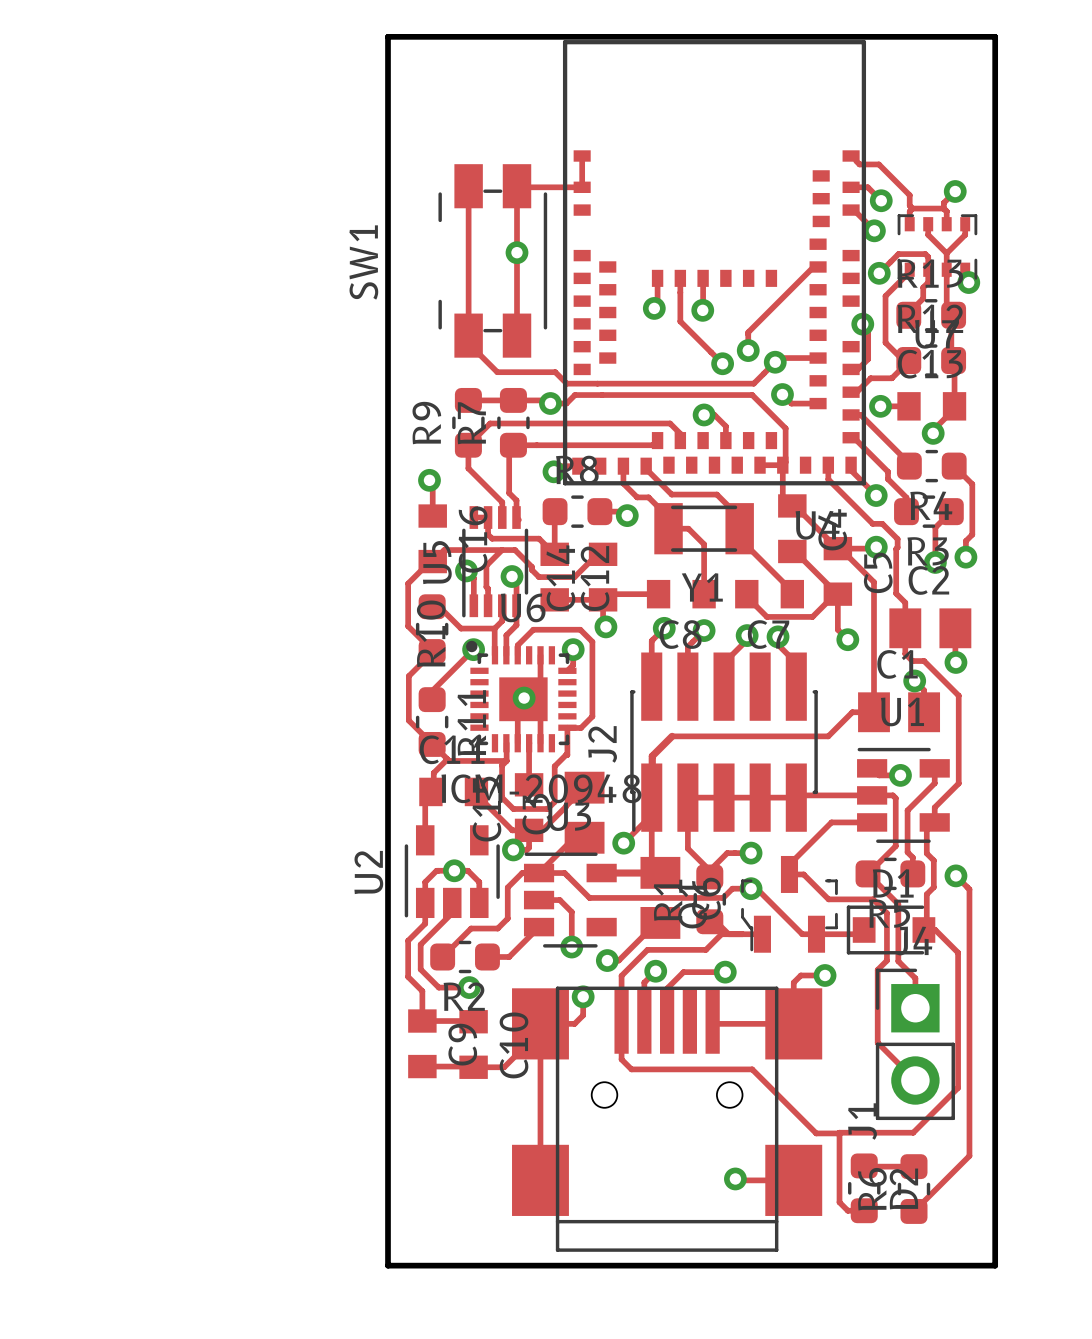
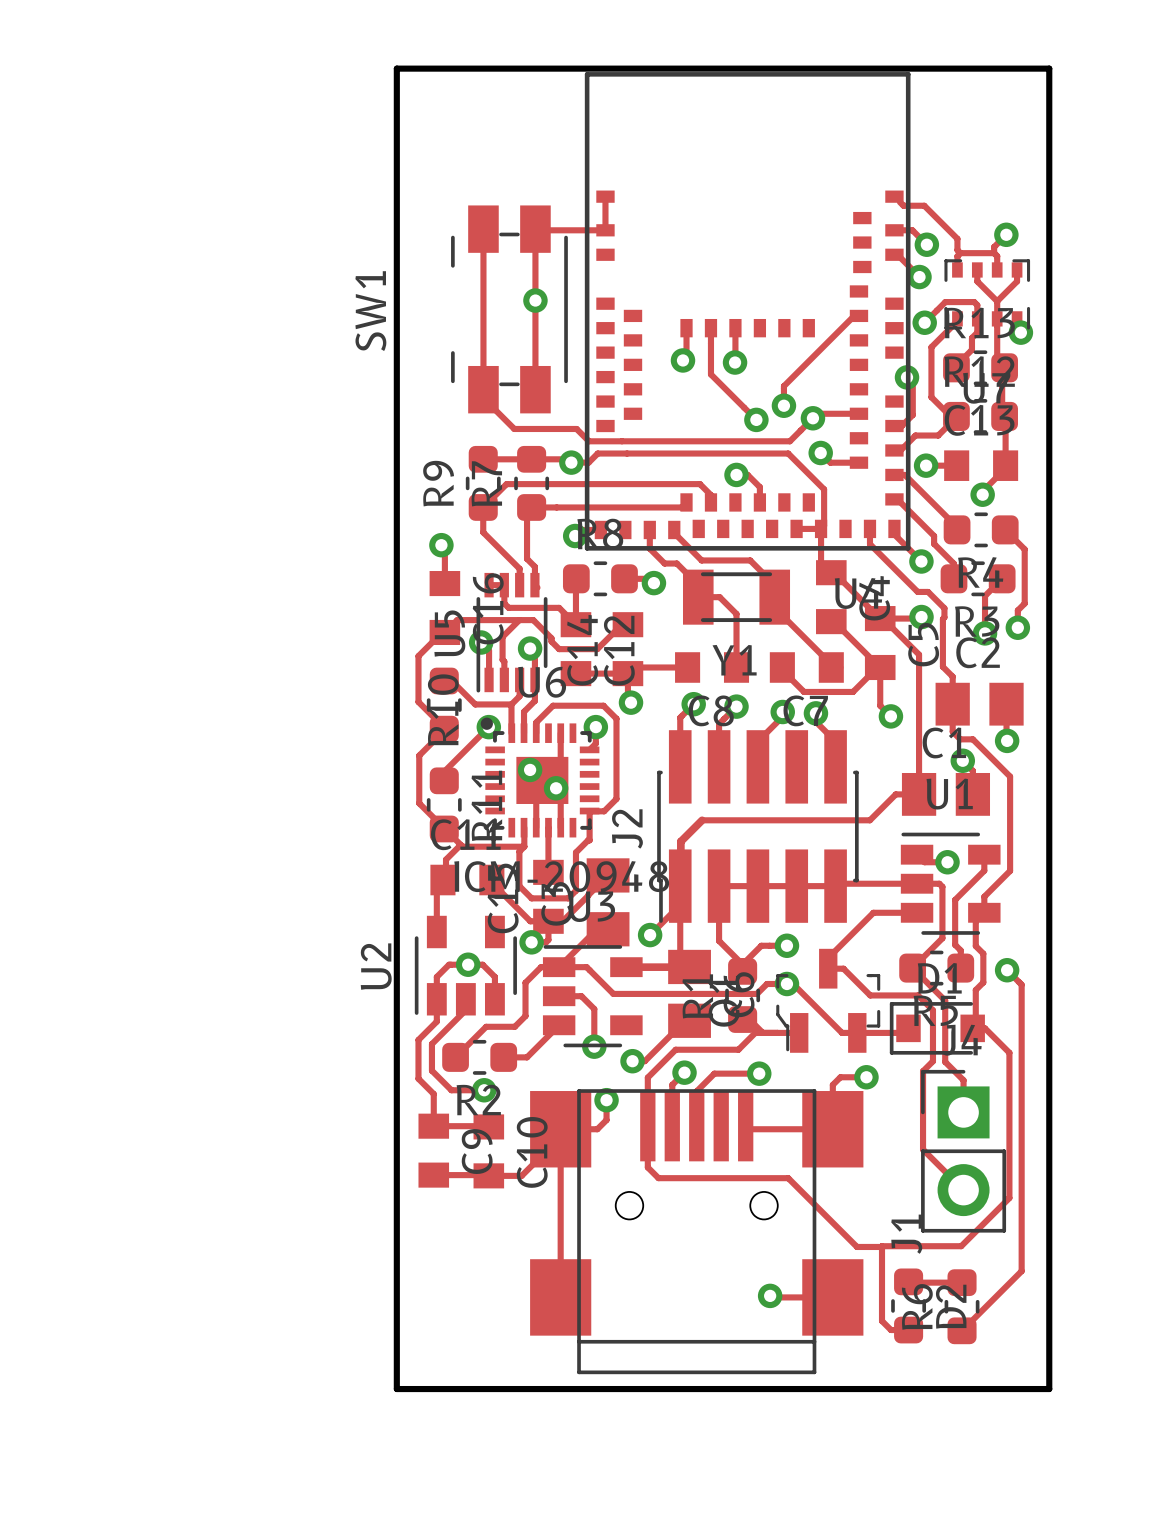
via: none -> (530, 769)
via: (524, 698) -> none
via: none -> (556, 788)

